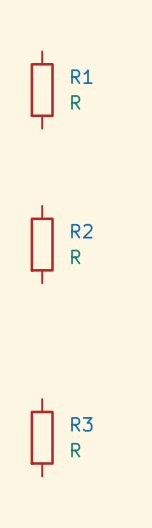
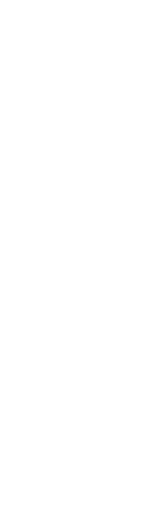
R1: R (42, 90) -> none
R2: R (42, 244) -> none
R3: R (42, 437) -> none

